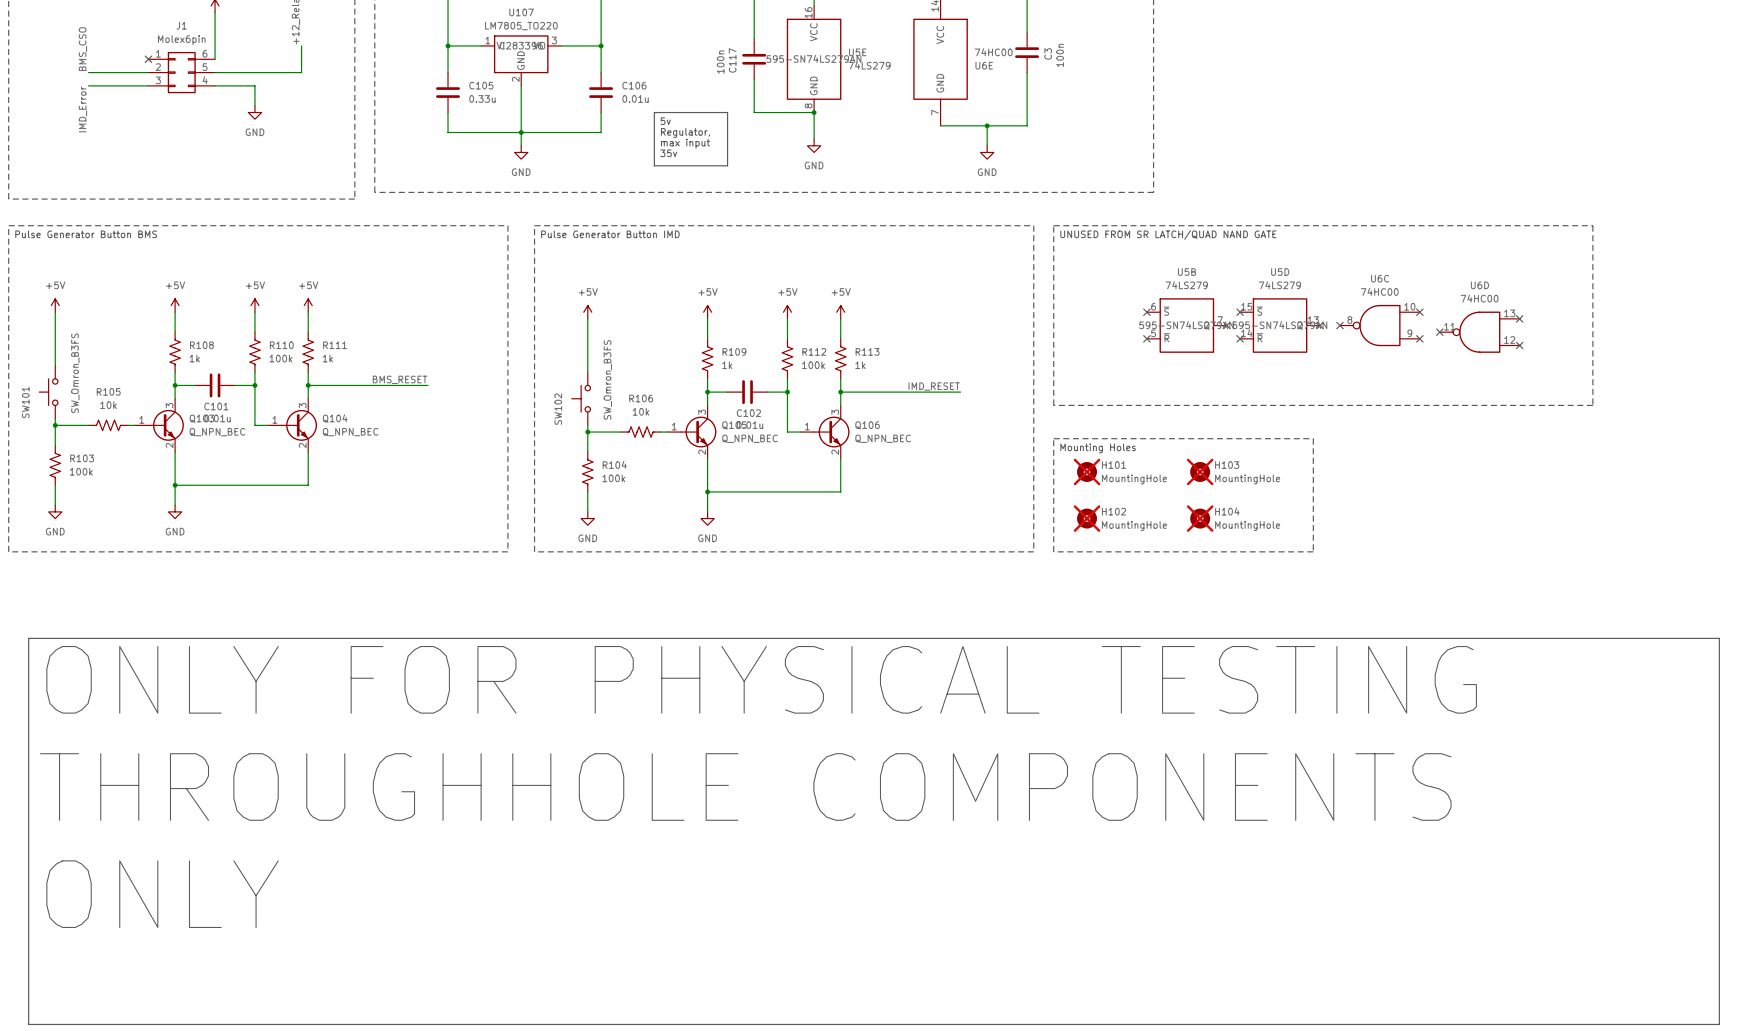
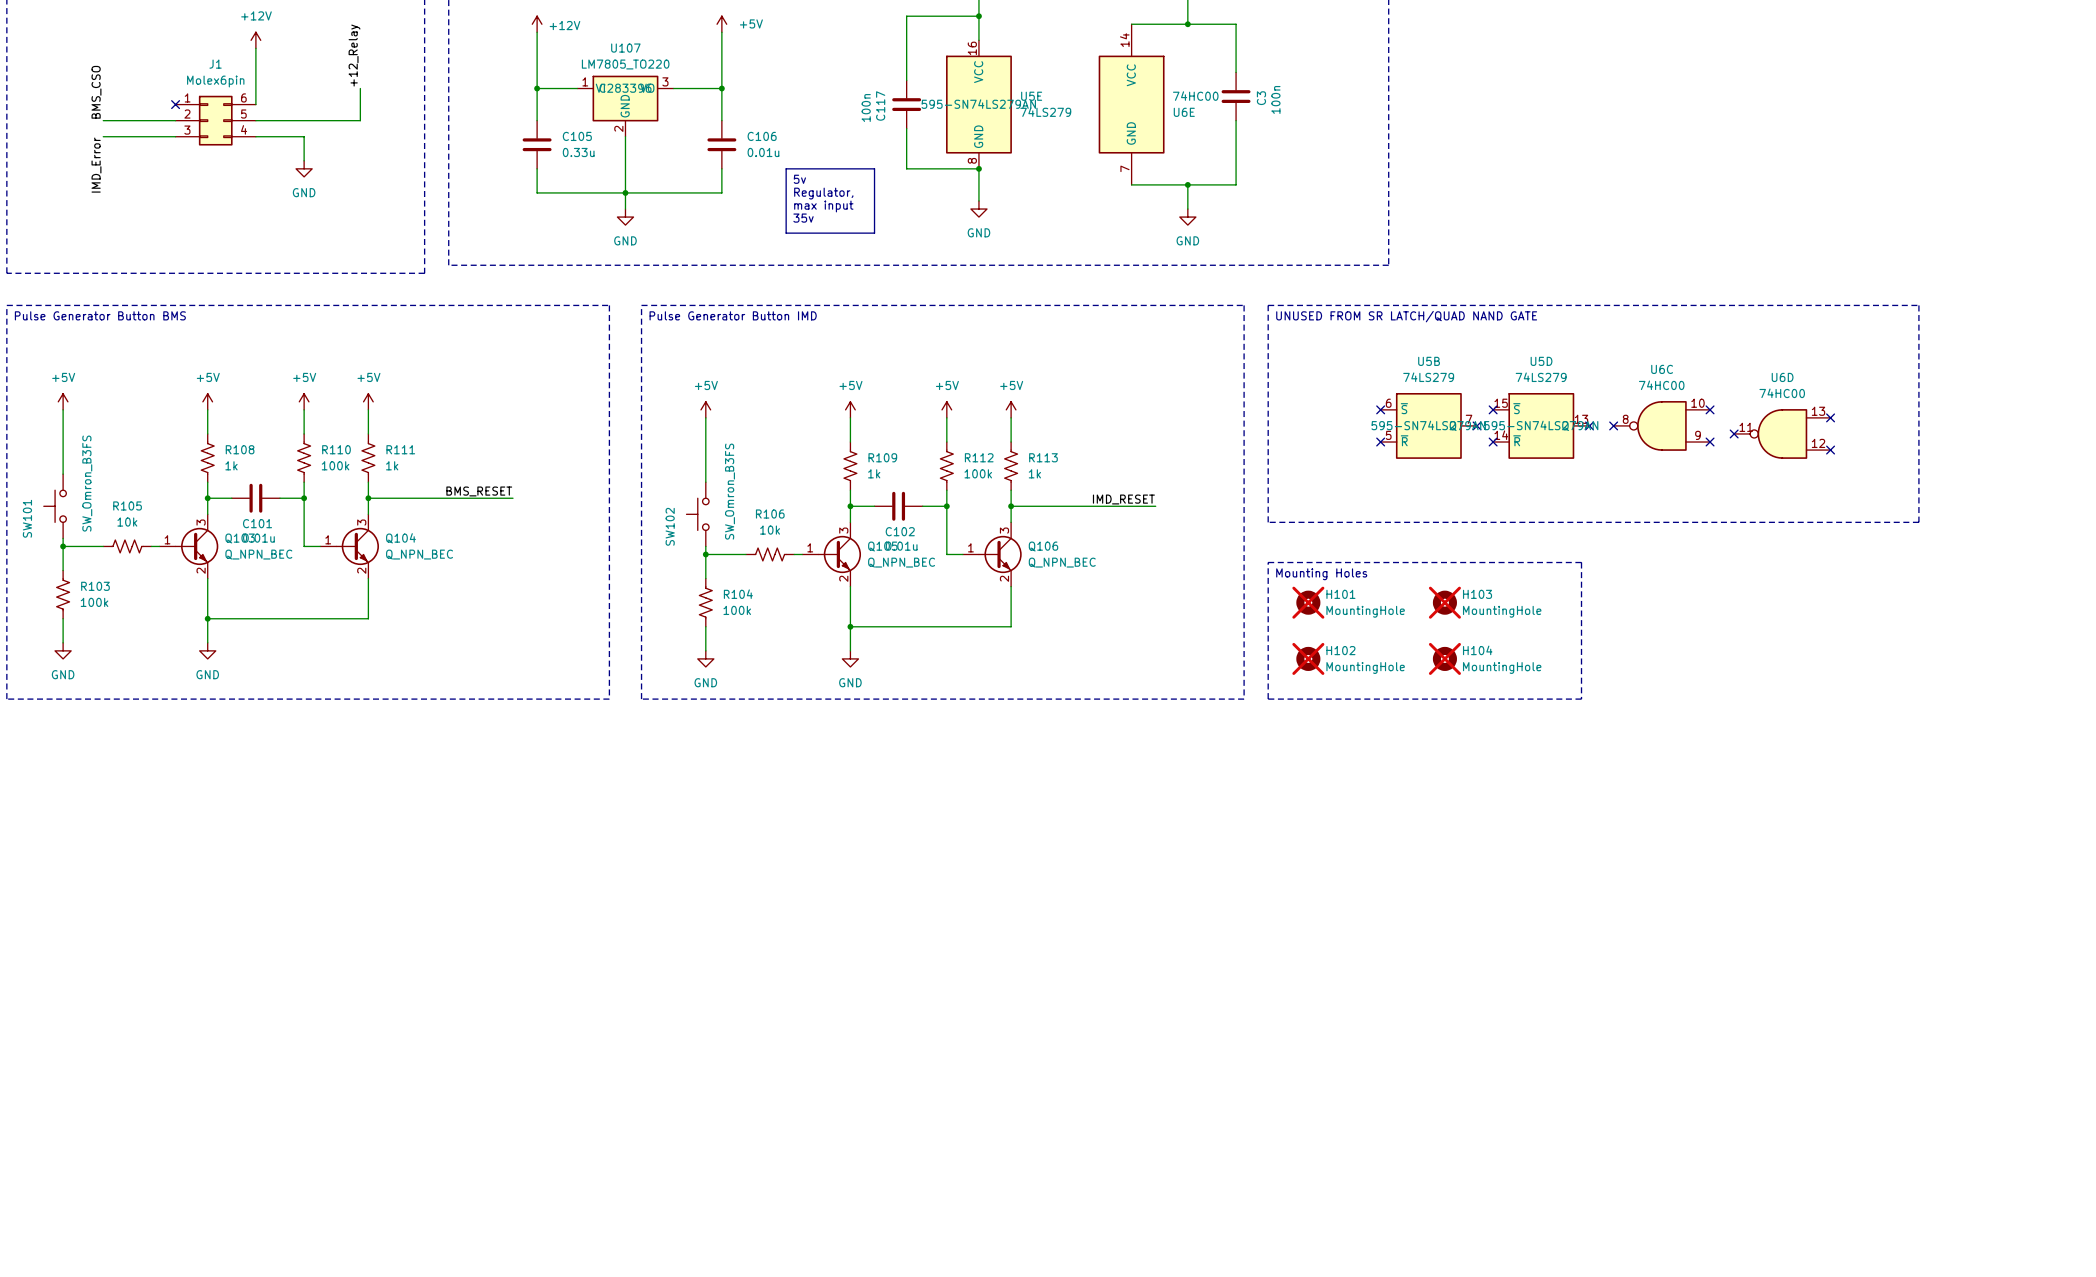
line: (28, 638) (1719, 638) (1719, 1024) (28, 1024) (28, 638) -> none
text: ONLY FOR PHYSICAL TESTING (761, 679) -> none
text: THROUGHHOLE COMPONENTS (745, 786) -> none
text: ONLY (162, 894) -> none

